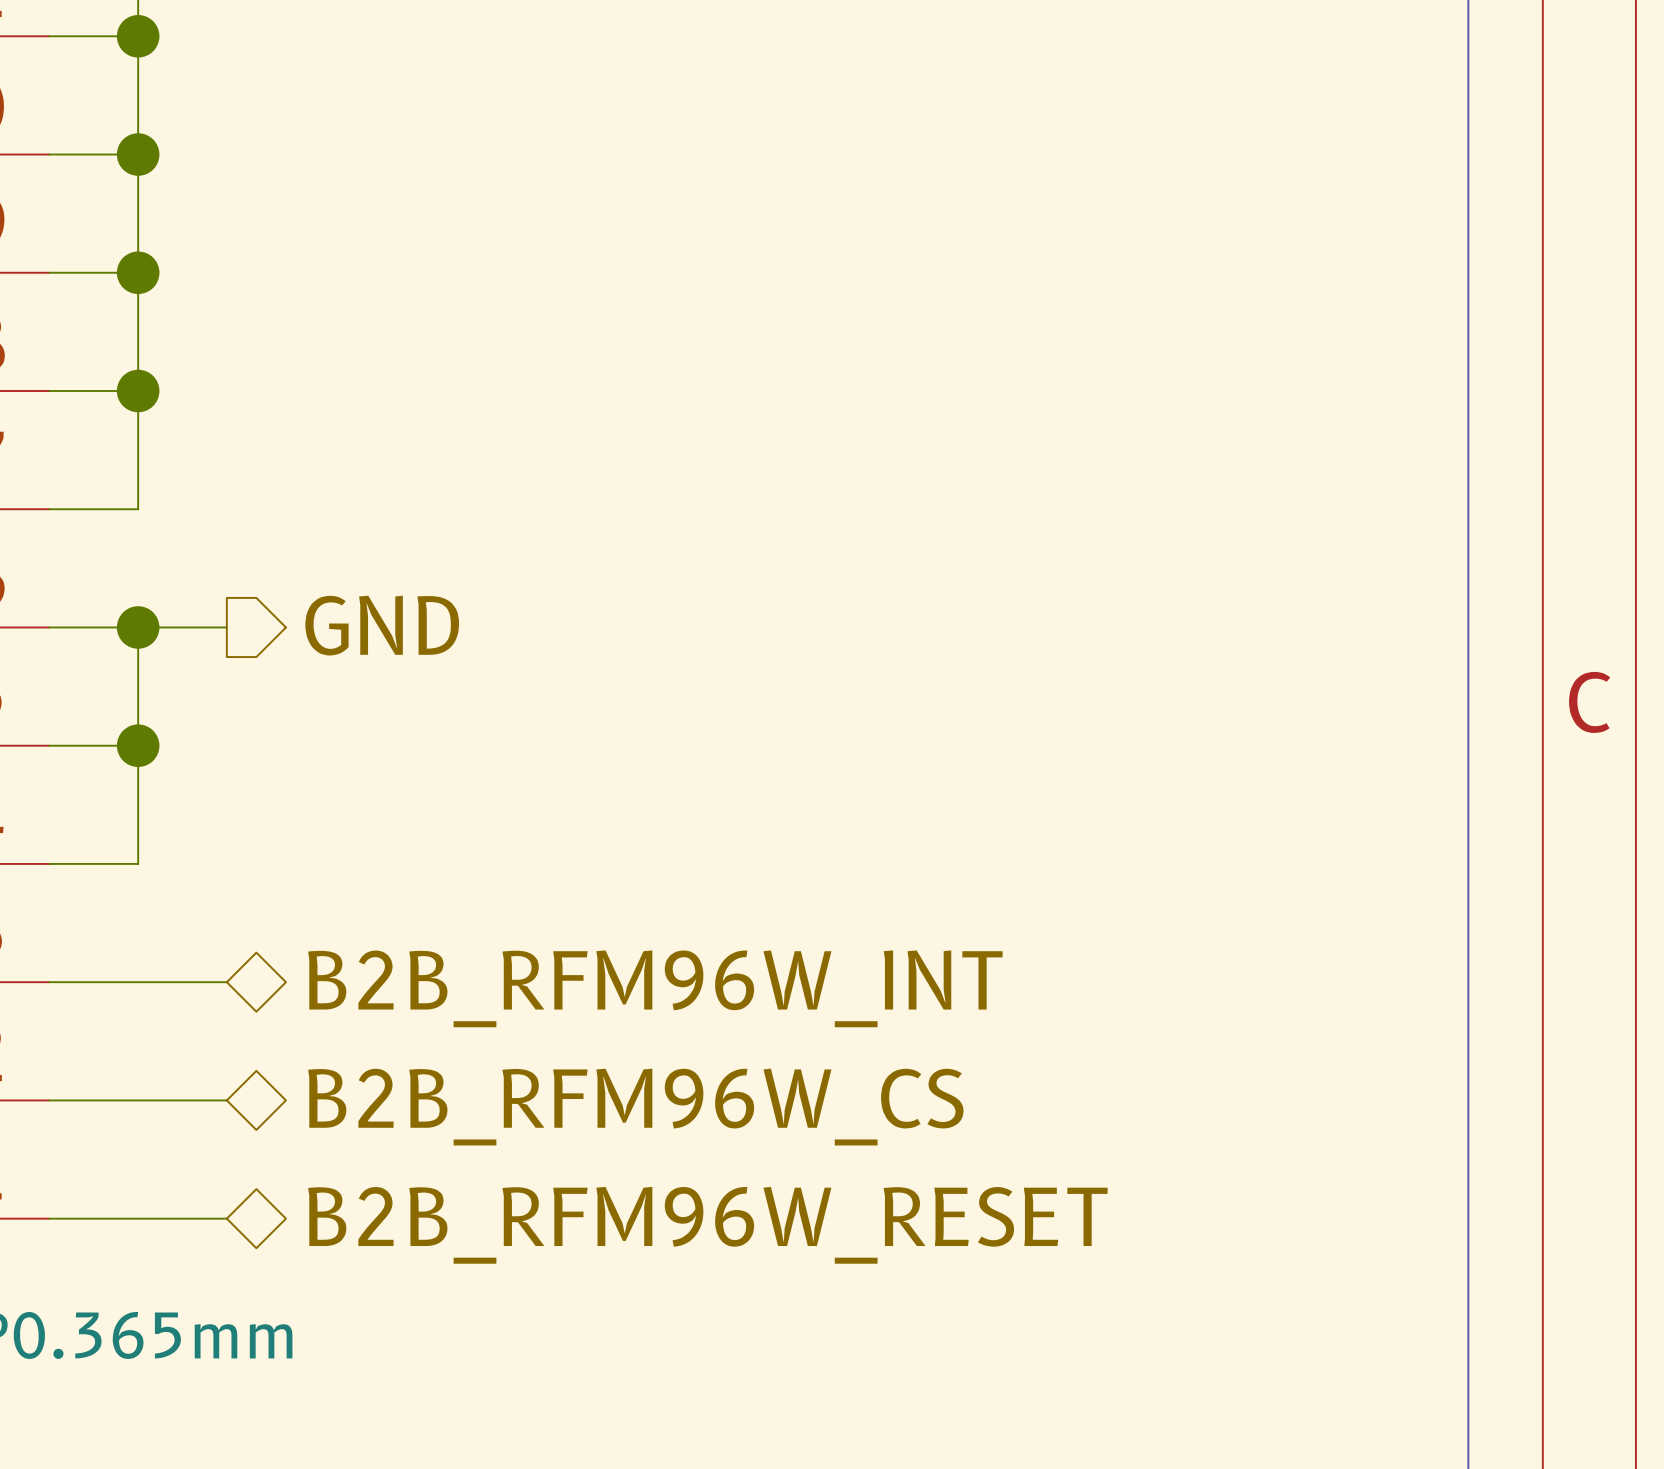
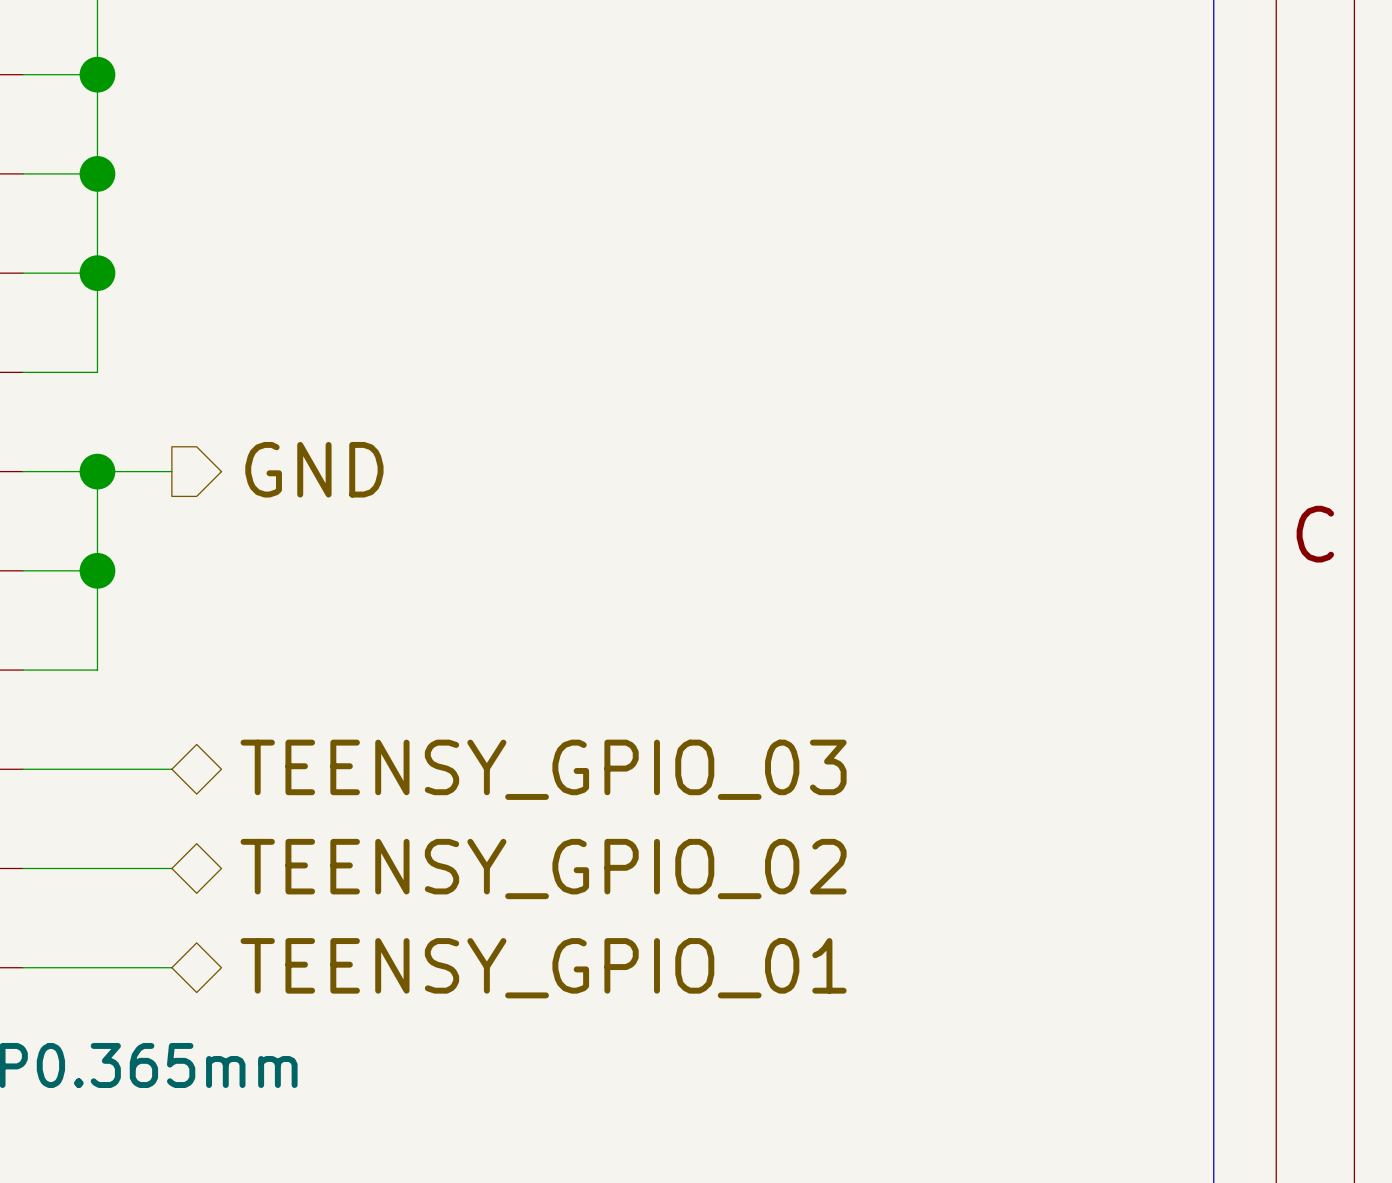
hierarchical label: B2B_RFM96W_INT (655, 988) -> TEENSY_GPIO_03 (543, 769)
hierarchical label: B2B_RFM96W_CS (635, 1107) -> TEENSY_GPIO_02 (543, 869)
hierarchical label: B2B_RFM96W_RESET (707, 1225) -> TEENSY_GPIO_01 (543, 968)

